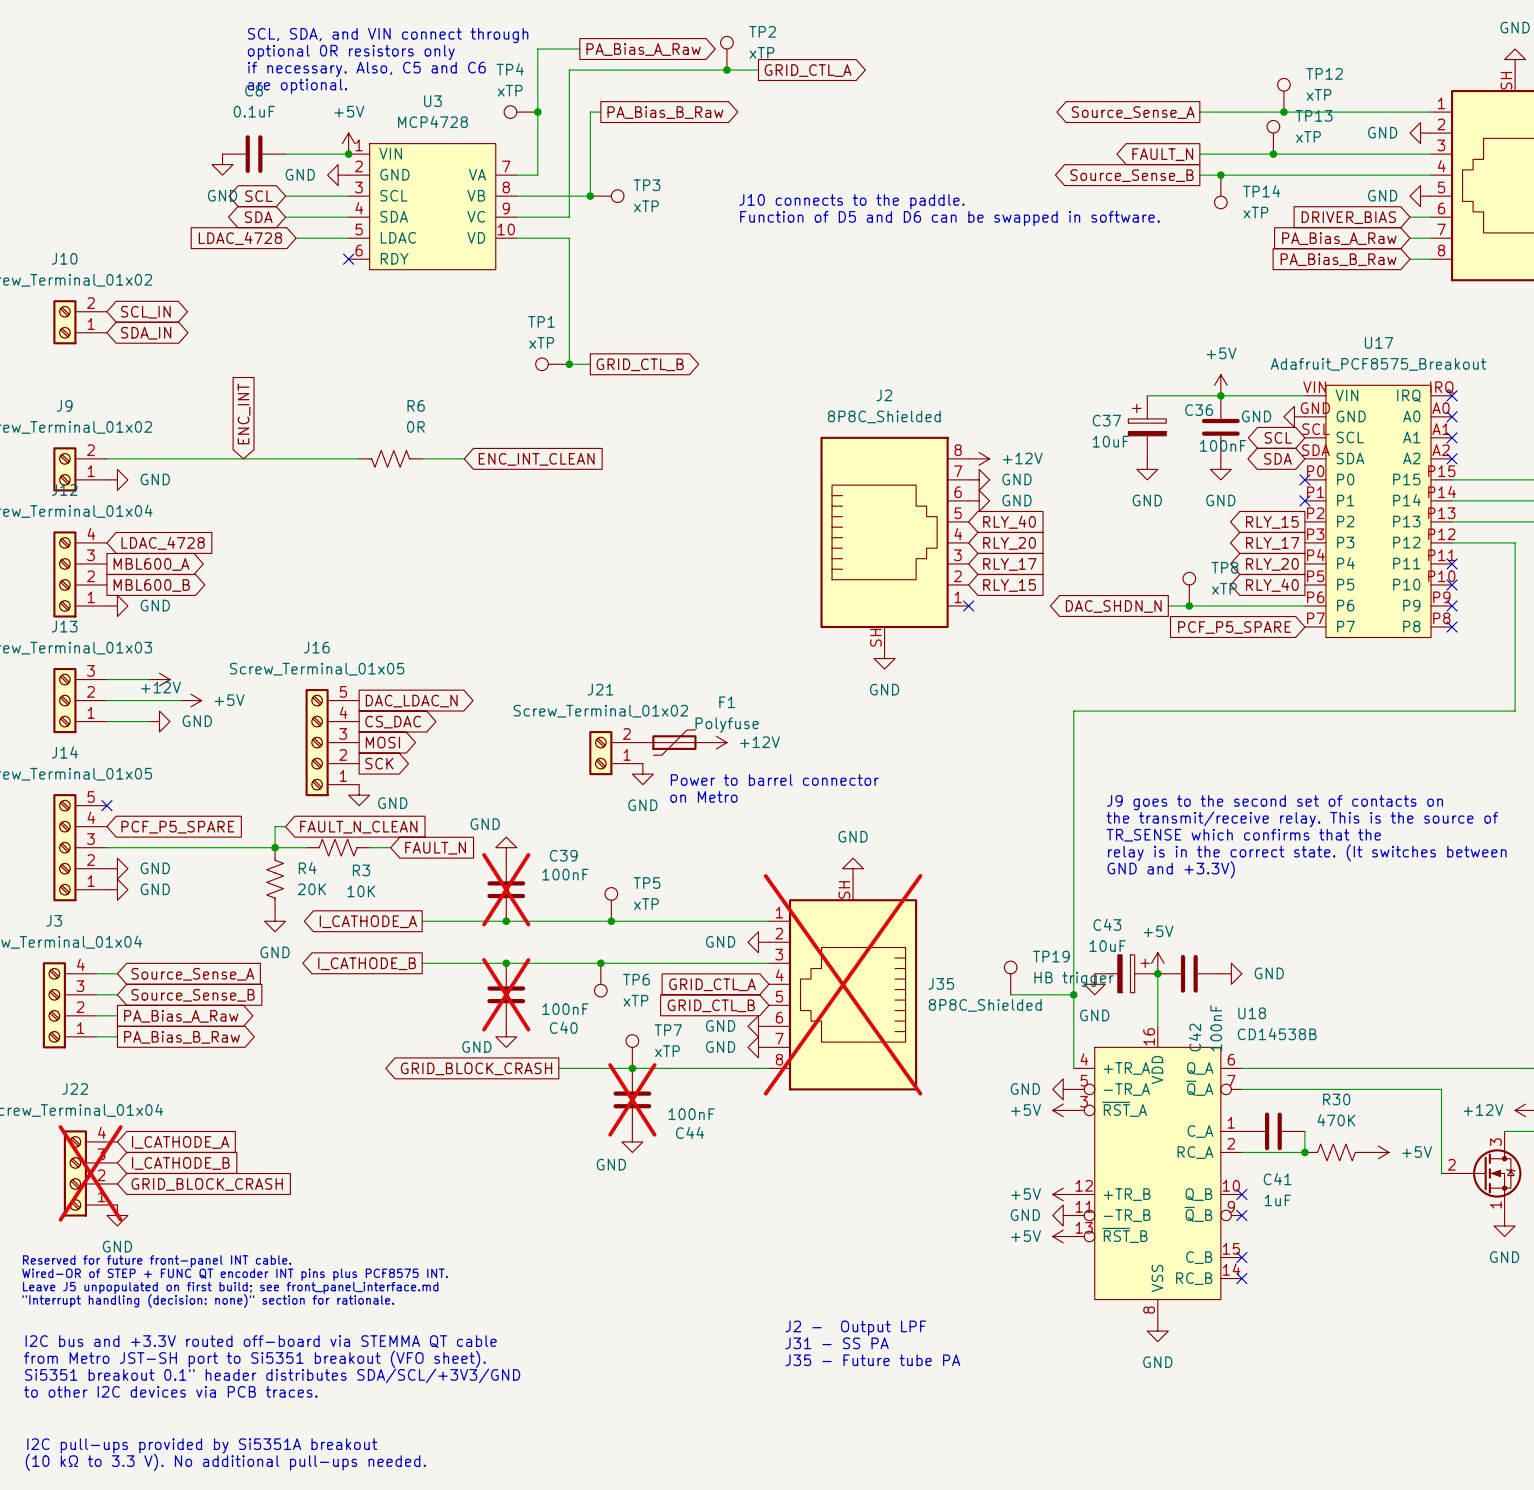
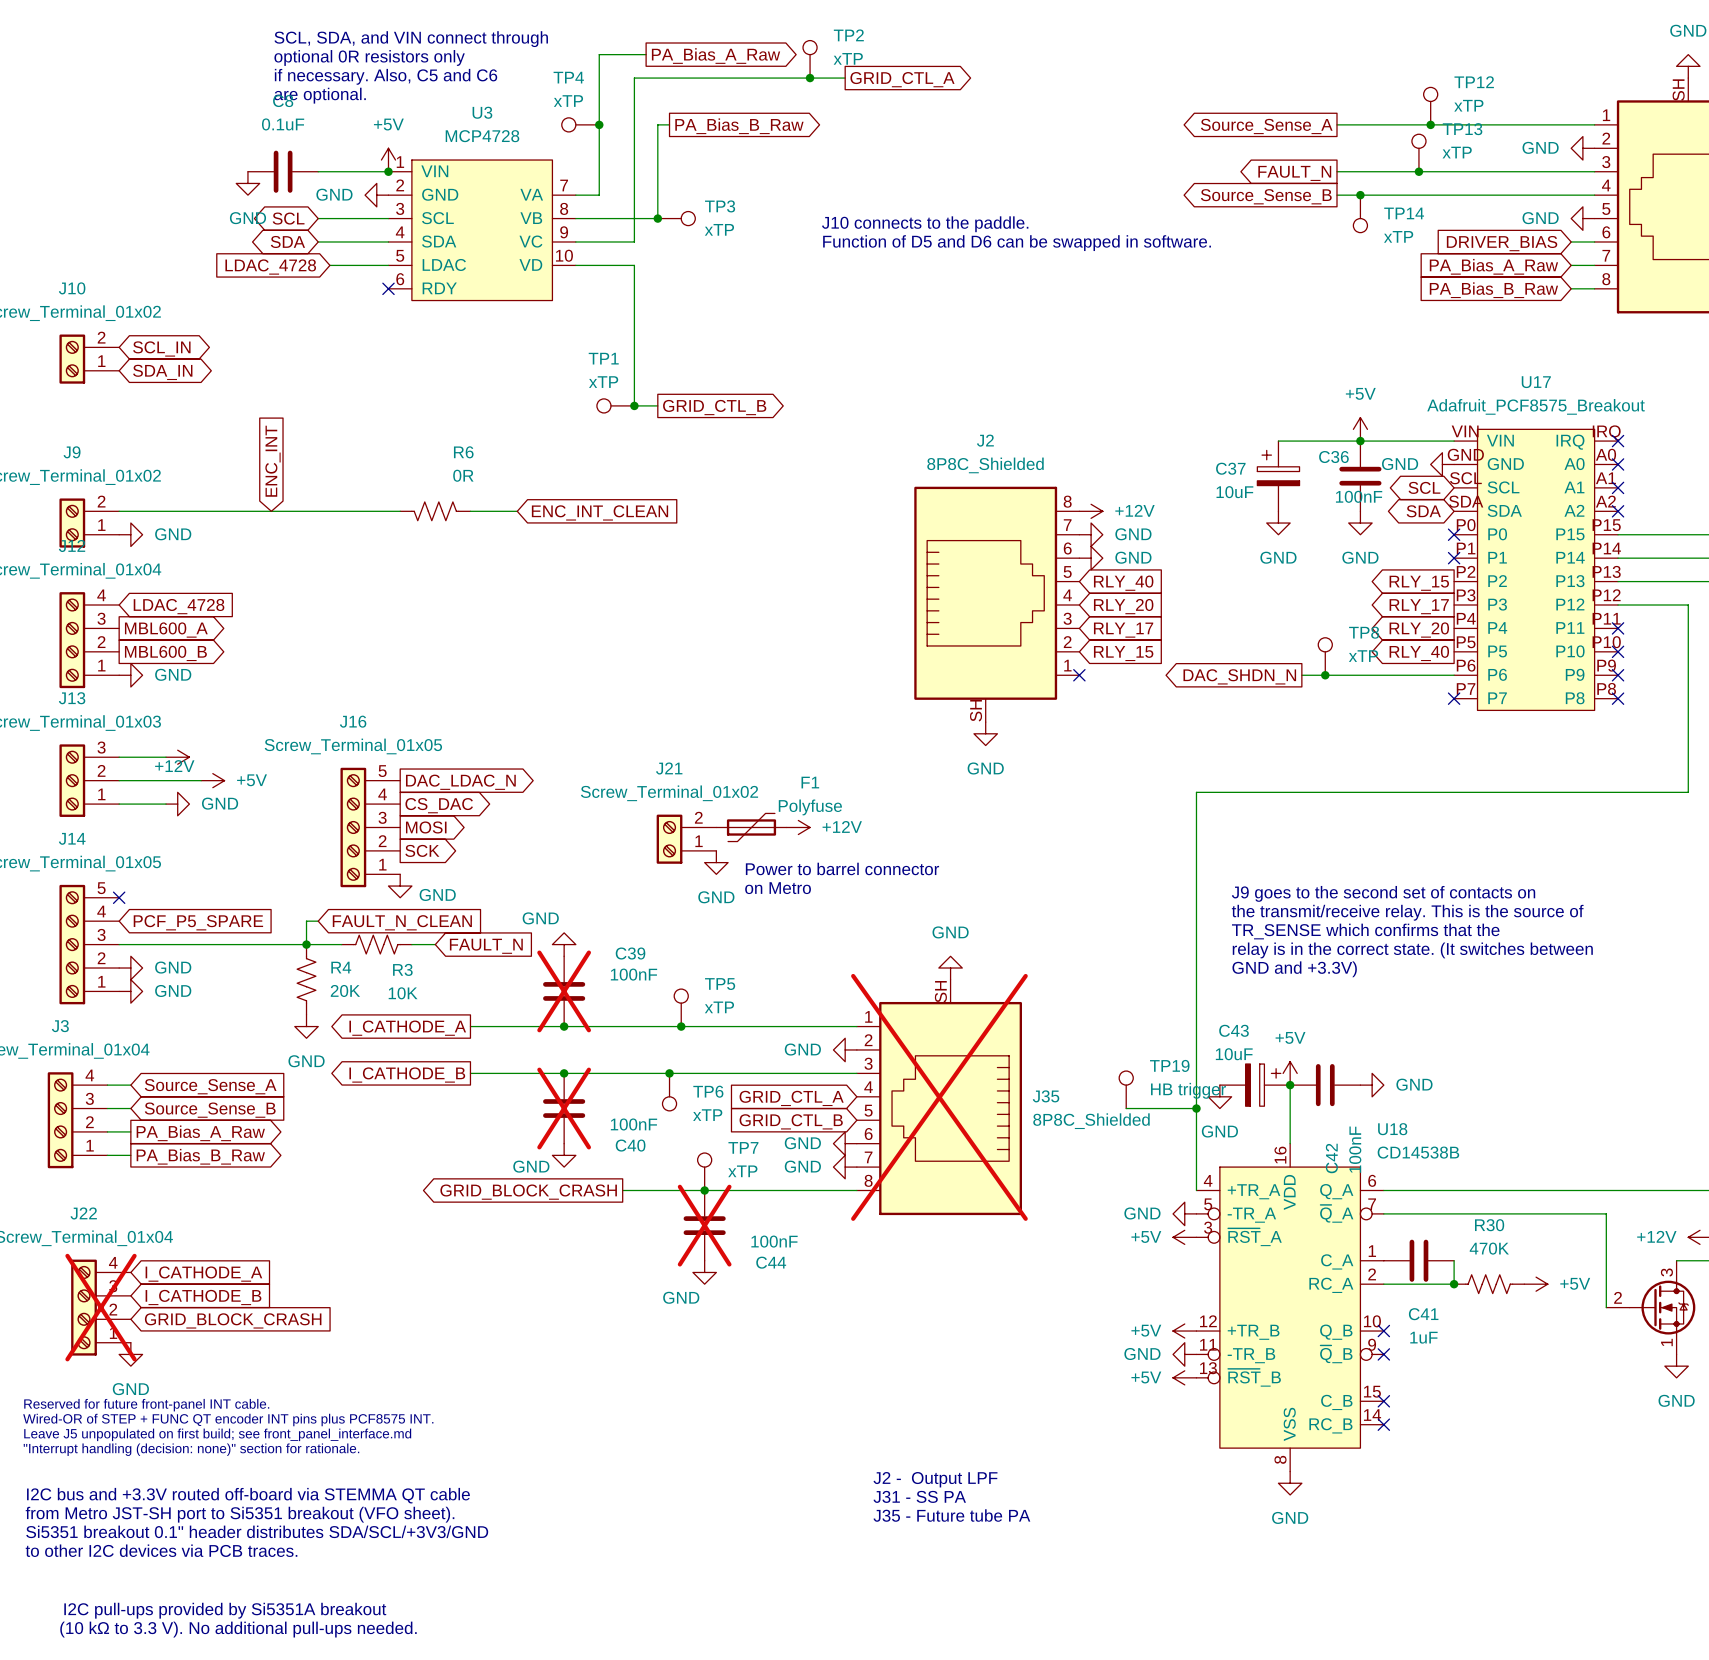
global label: PCF_P5_SPARE (1234, 627) -> none
no-connect mark: none -> (1454, 698)

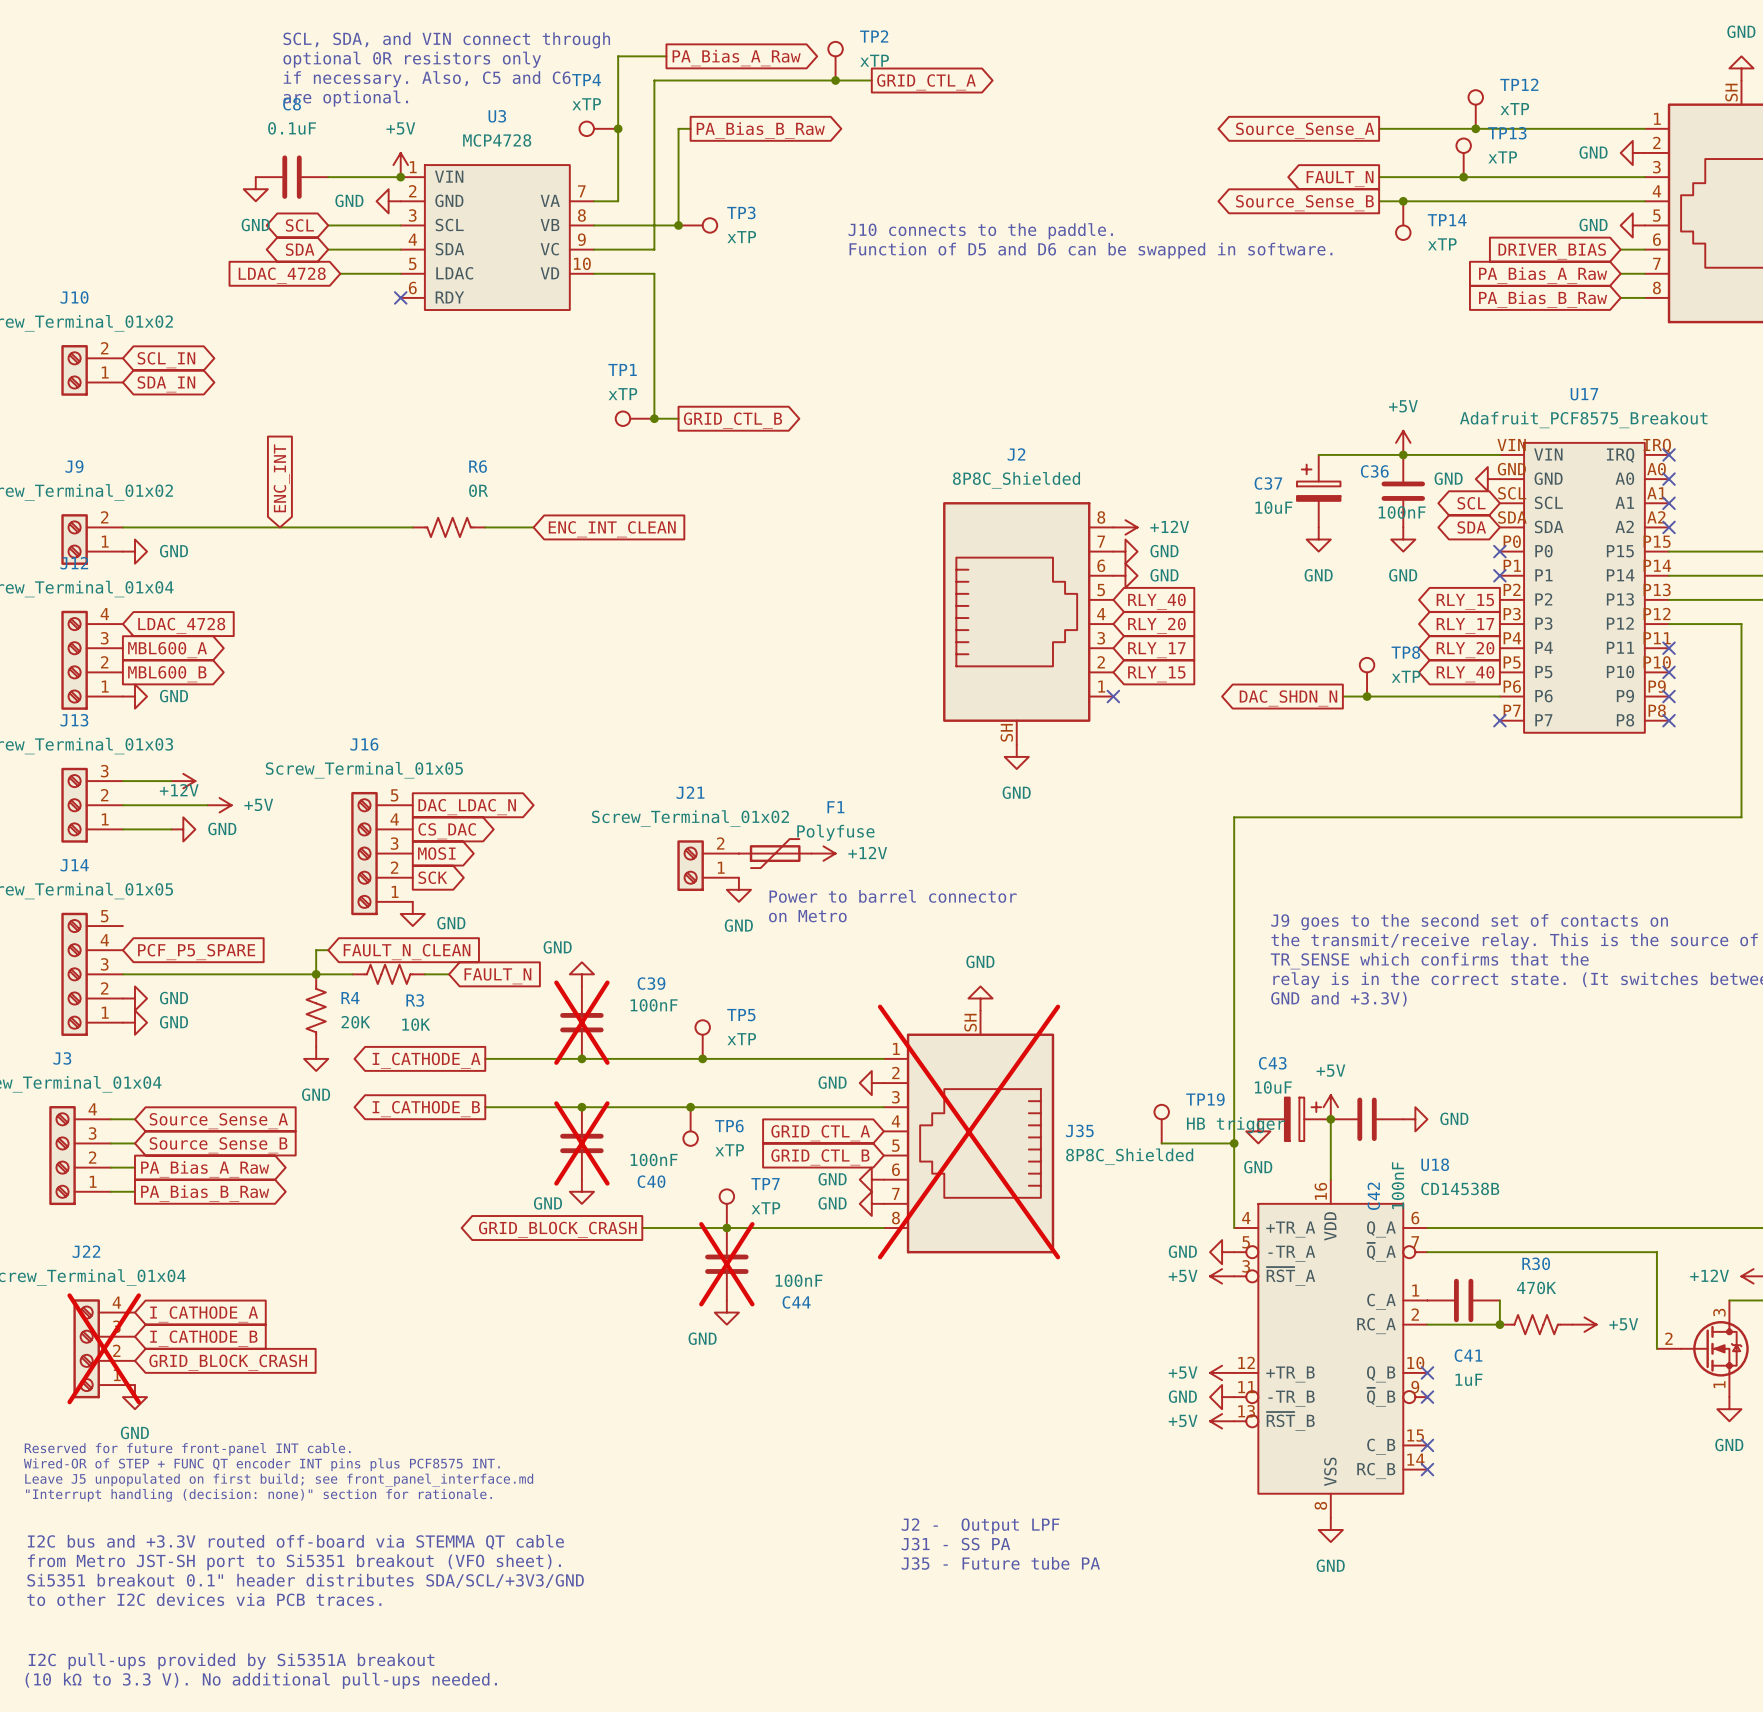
no-connect mark: (119, 897) -> none

